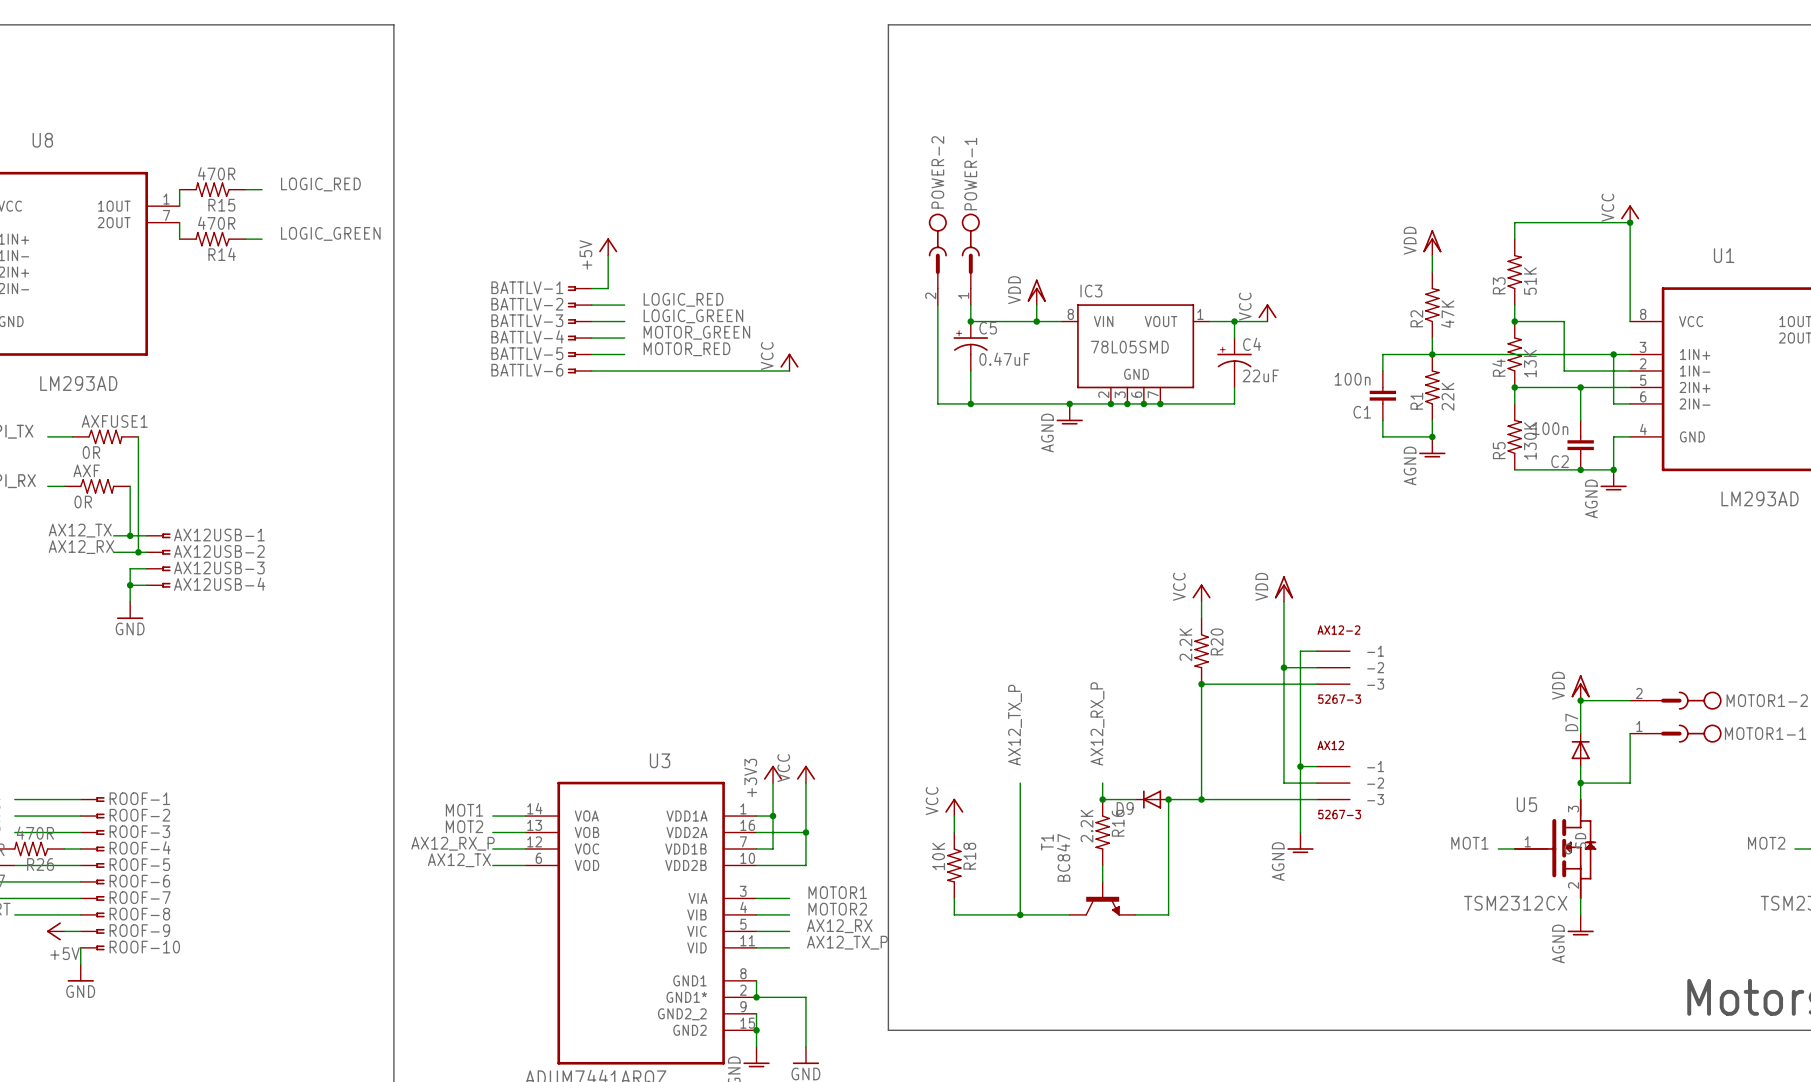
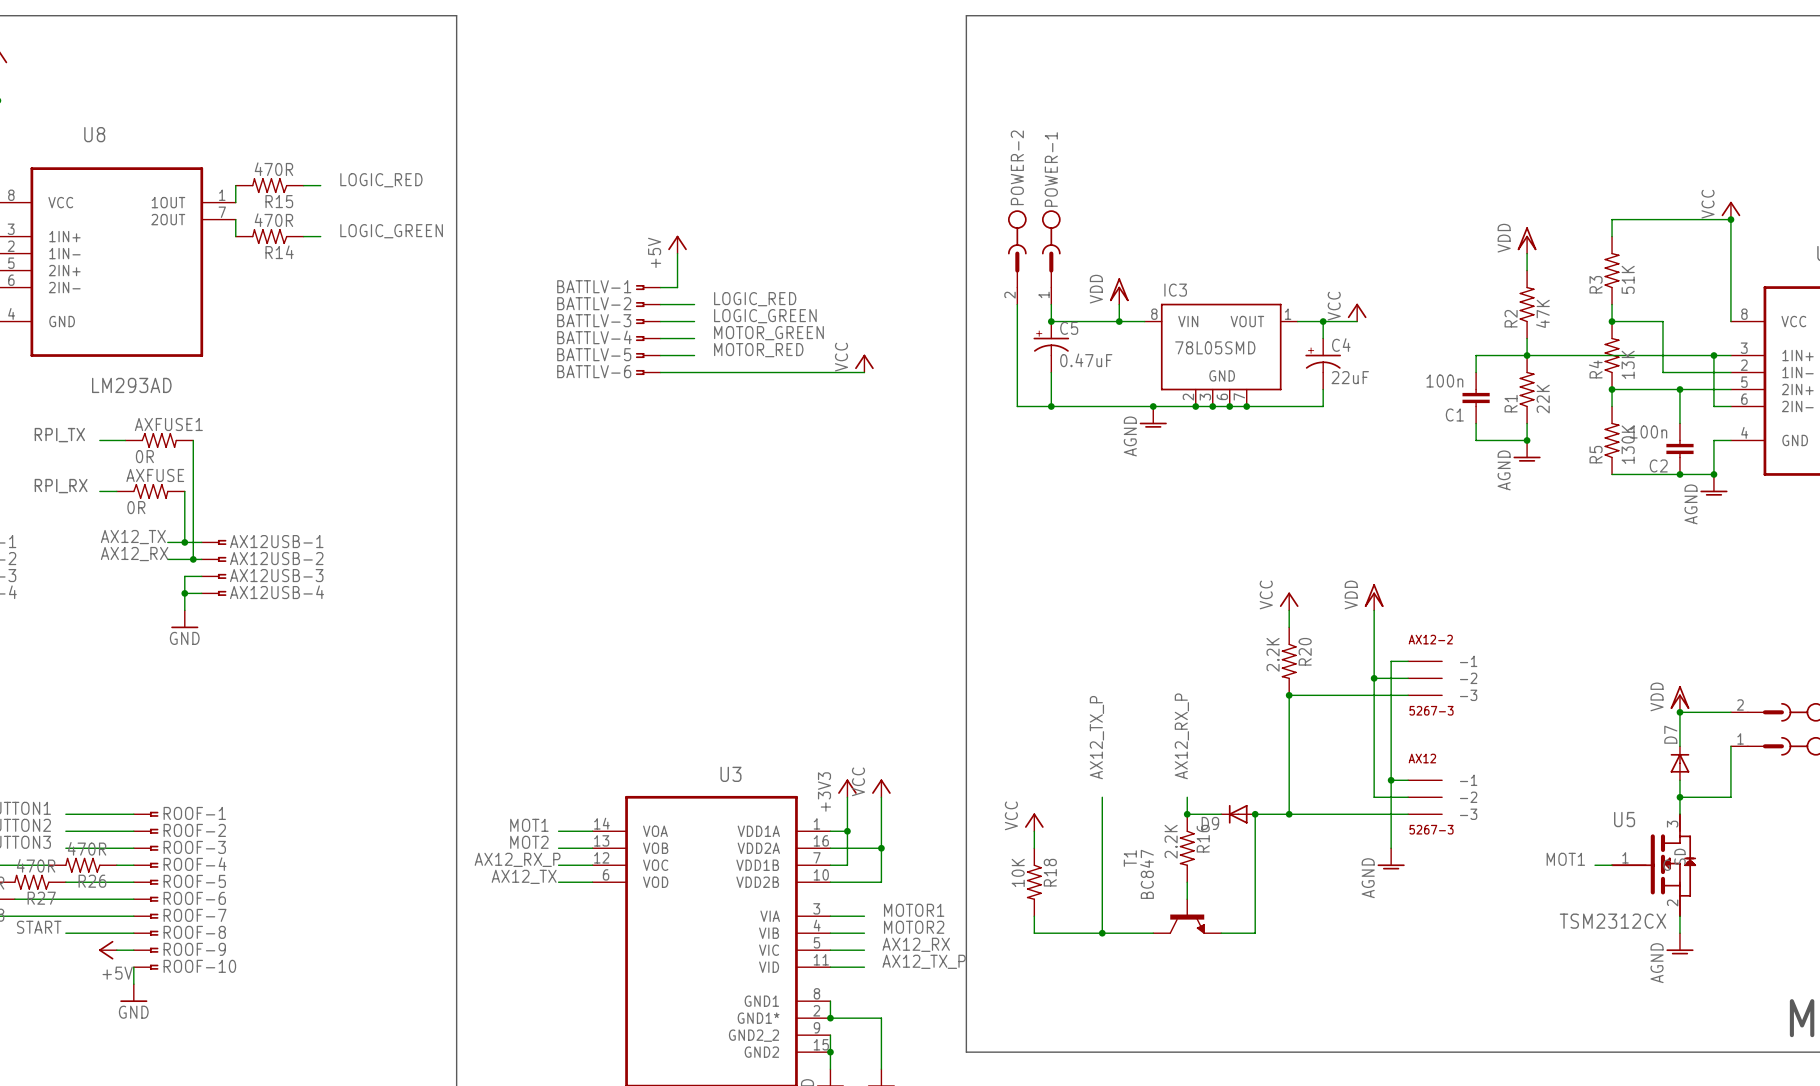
AXF name: AXF (86, 470) -> AXFUSE (155, 475)

